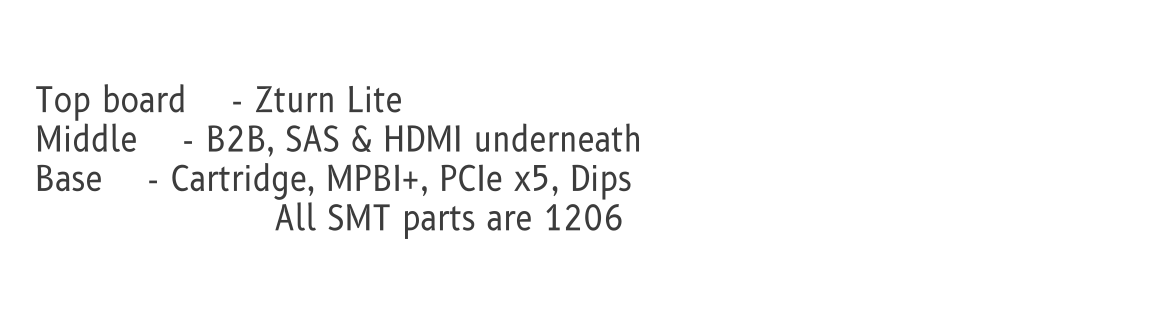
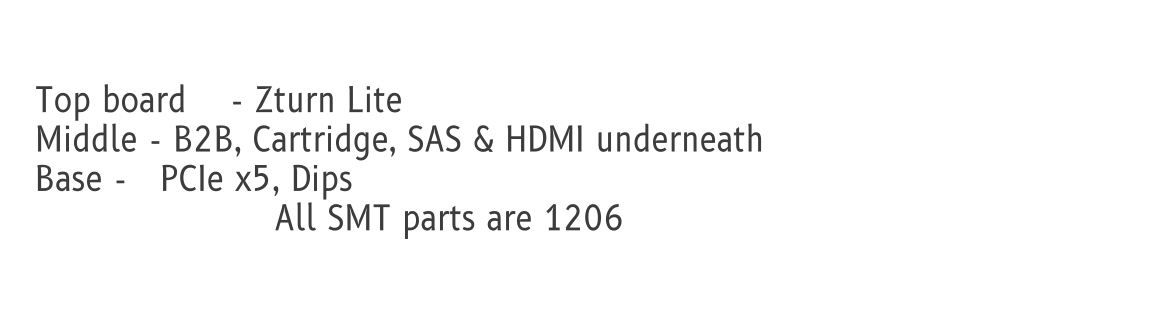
text: Middle - B2B, SAS & HDMI underneath (338, 140) -> Middle - B2B, Cartridge, SAS & HDMI underneath (399, 142)
text: Base - Cartridge, MPBI+, PCIe x5, Dips (333, 181) -> Base - PCIe x5, Dips (194, 182)

